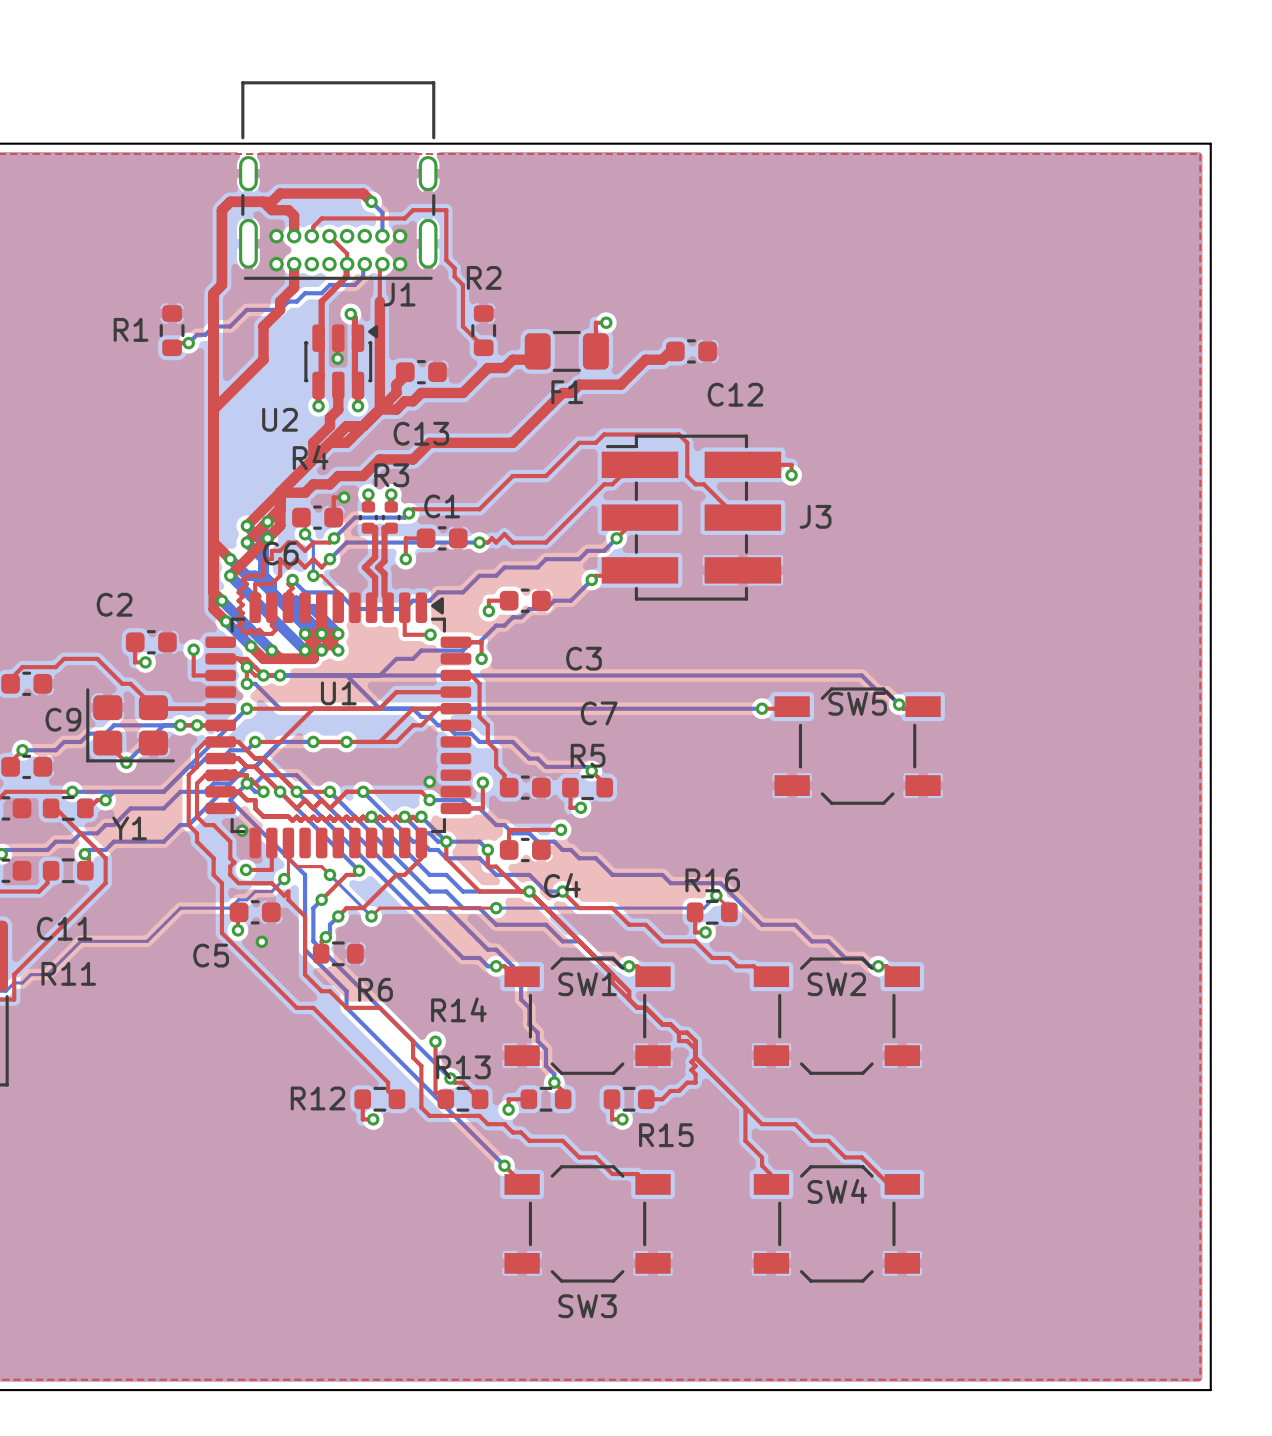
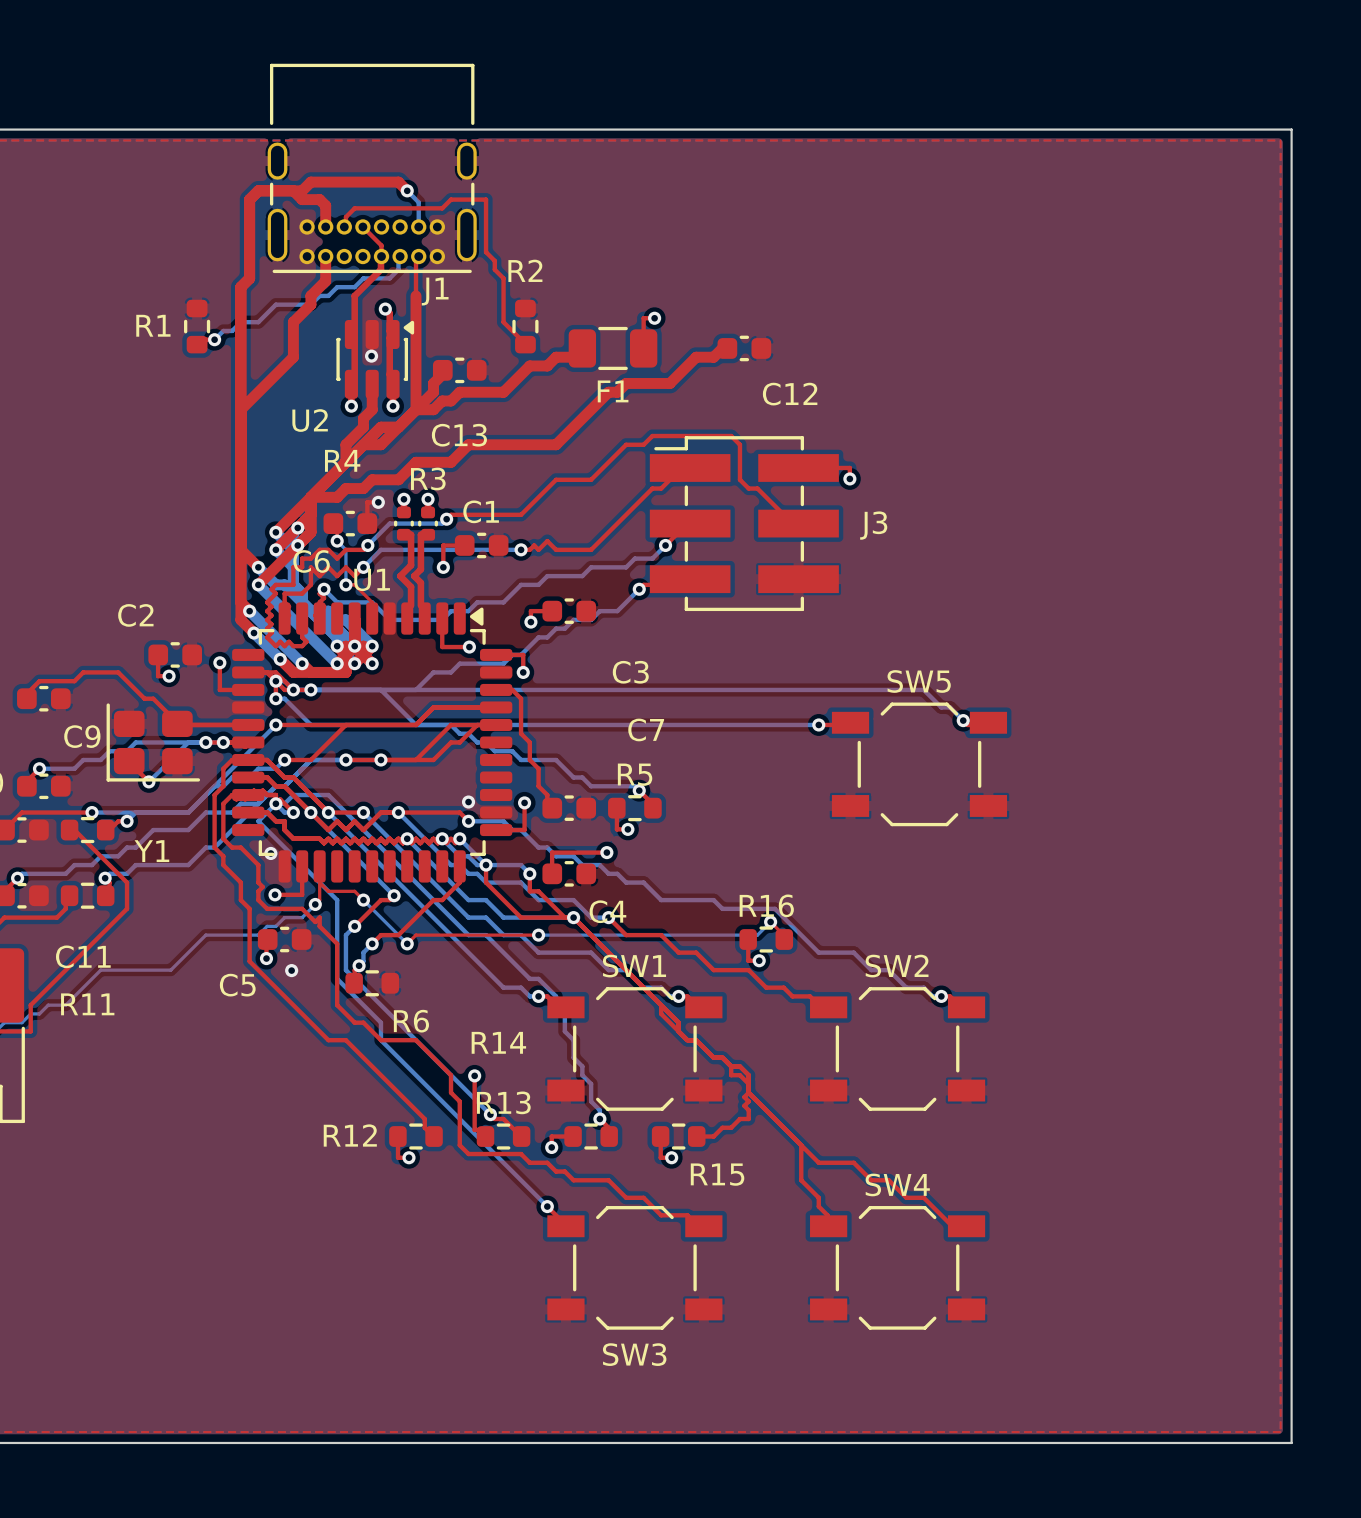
U1 name position: U1 (338, 693) -> U1 (372, 579)
SW5 name position: SW5 (857, 703) -> SW5 (919, 681)
SW1 name position: SW1 (587, 984) -> SW1 (634, 966)
SW2 name position: SW2 (836, 984) -> SW2 (897, 966)
SW4 name position: SW4 (837, 1191) -> SW4 (897, 1184)

